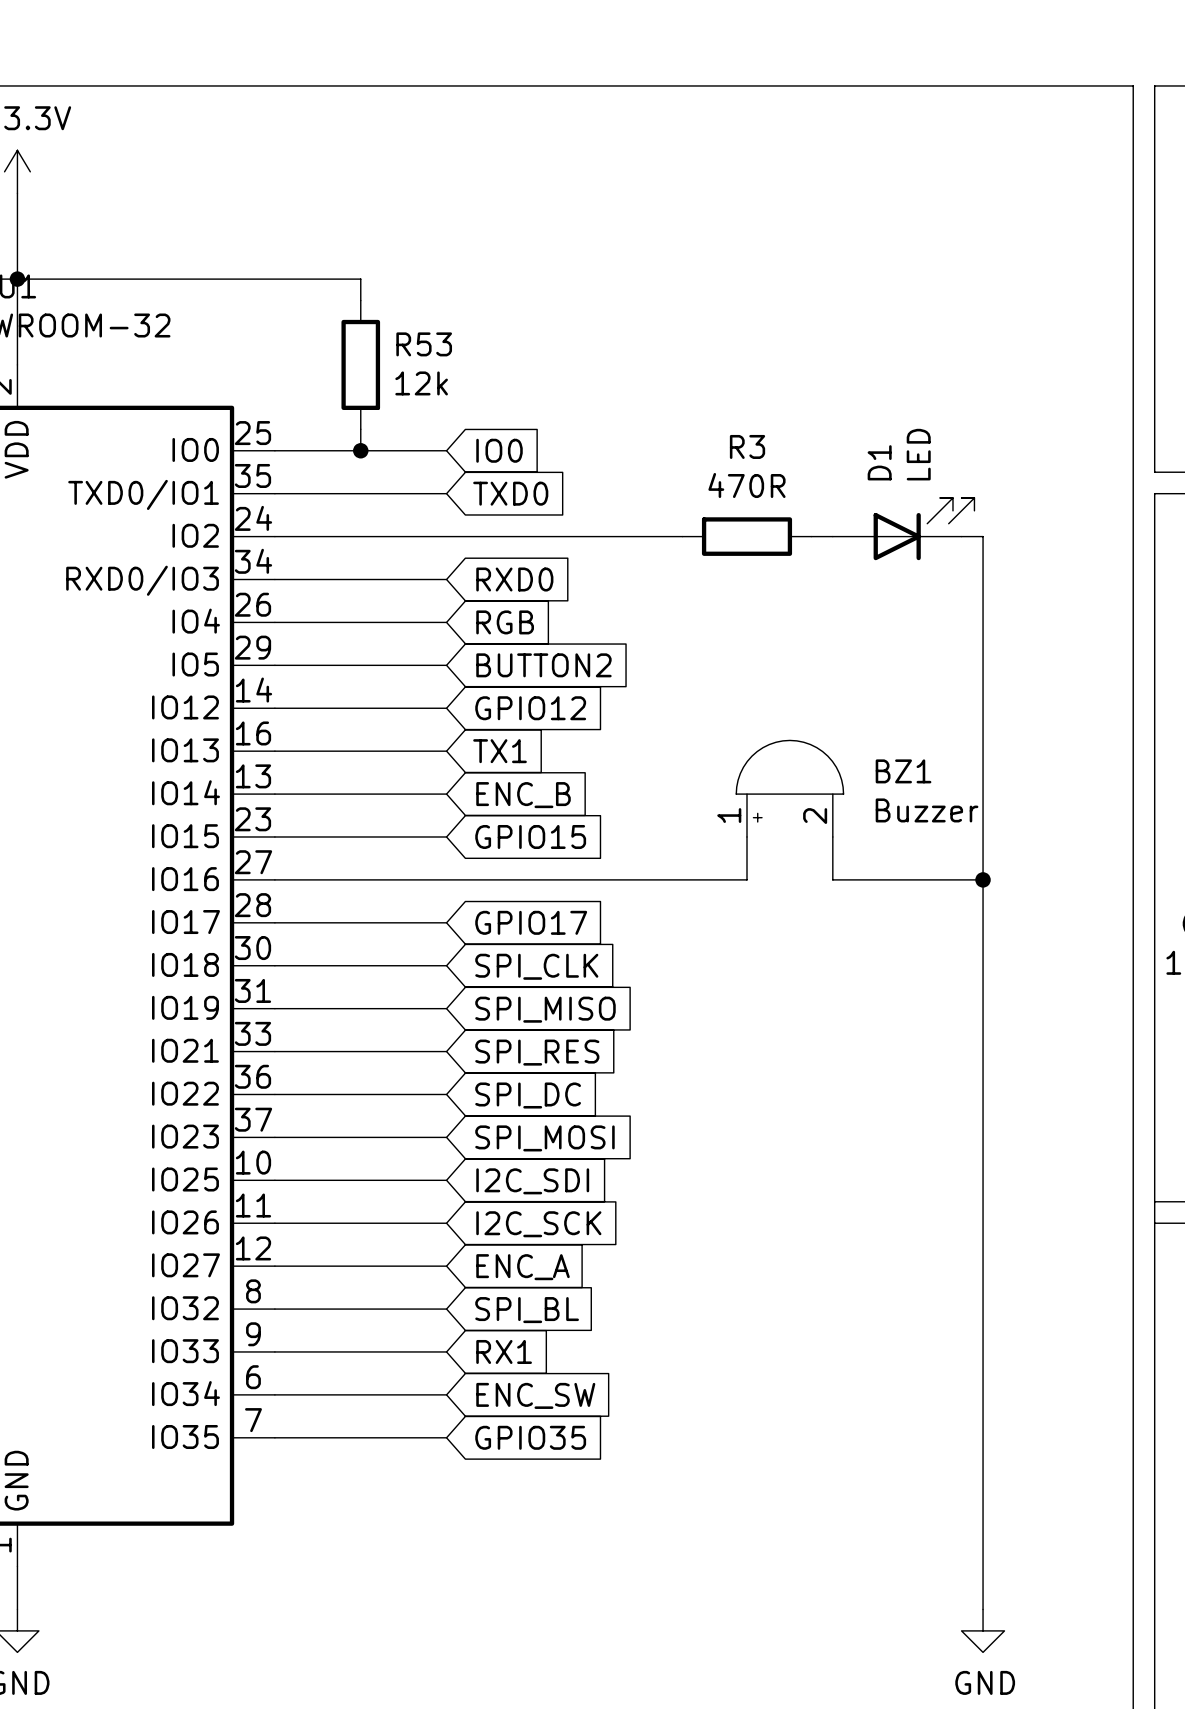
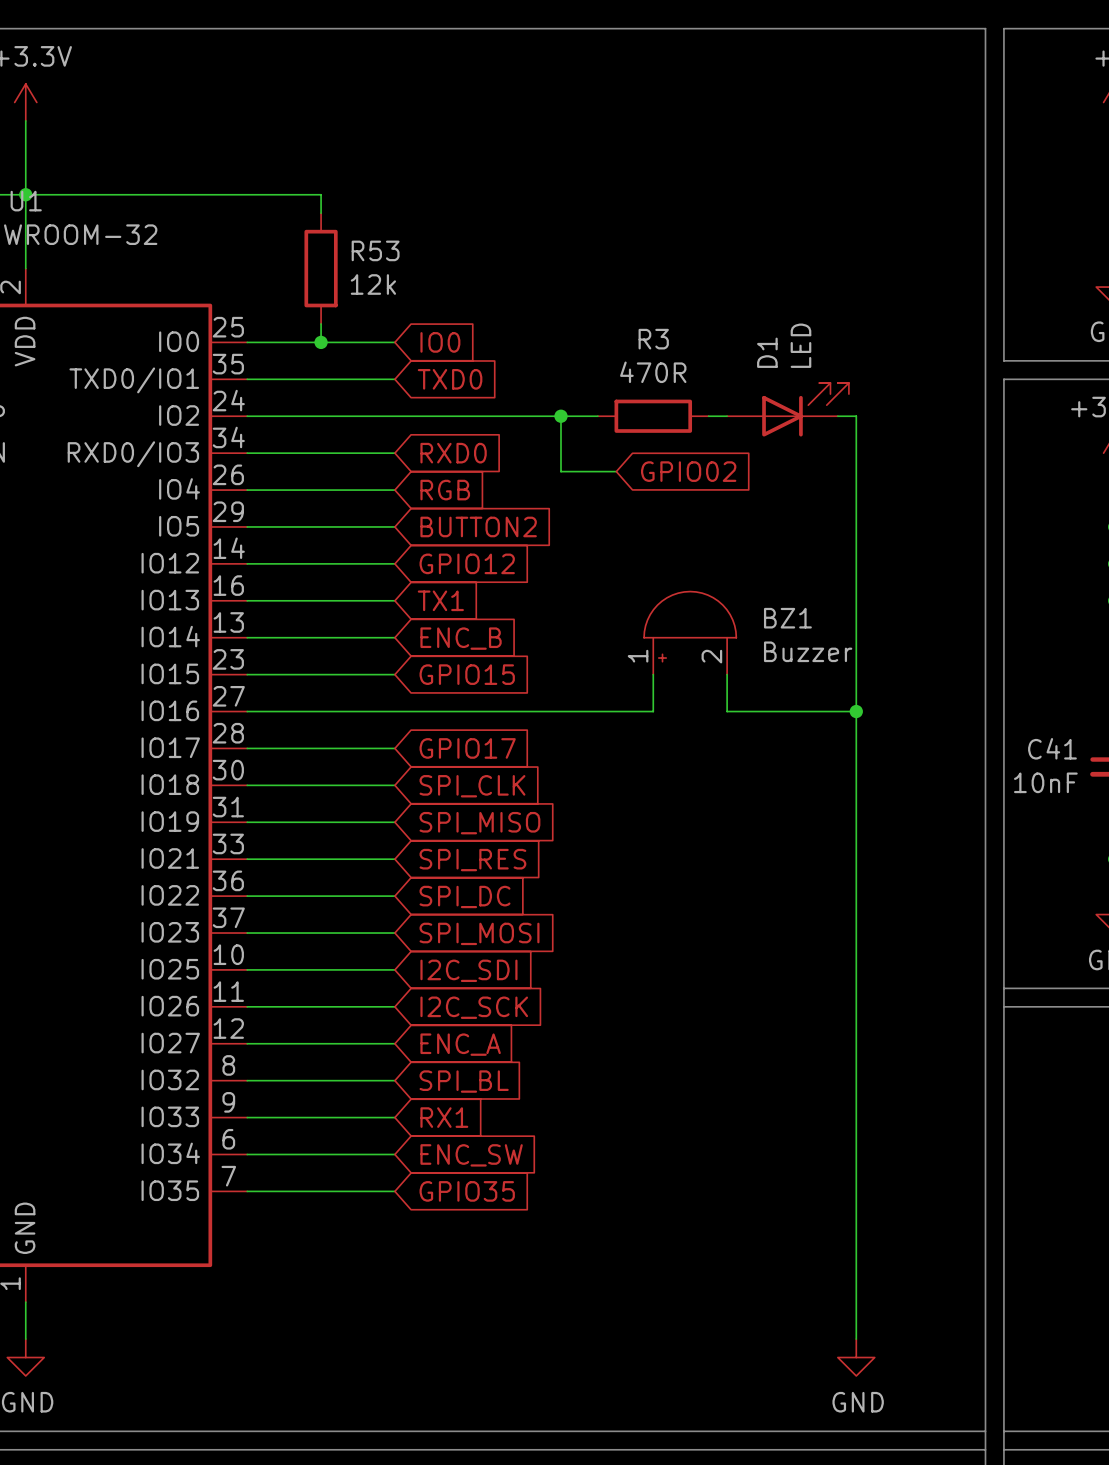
wire: none -> (560, 416) (560, 471) (616, 471)
junction: none -> (560, 416)
global label: none -> GPIO02 (688, 471)

